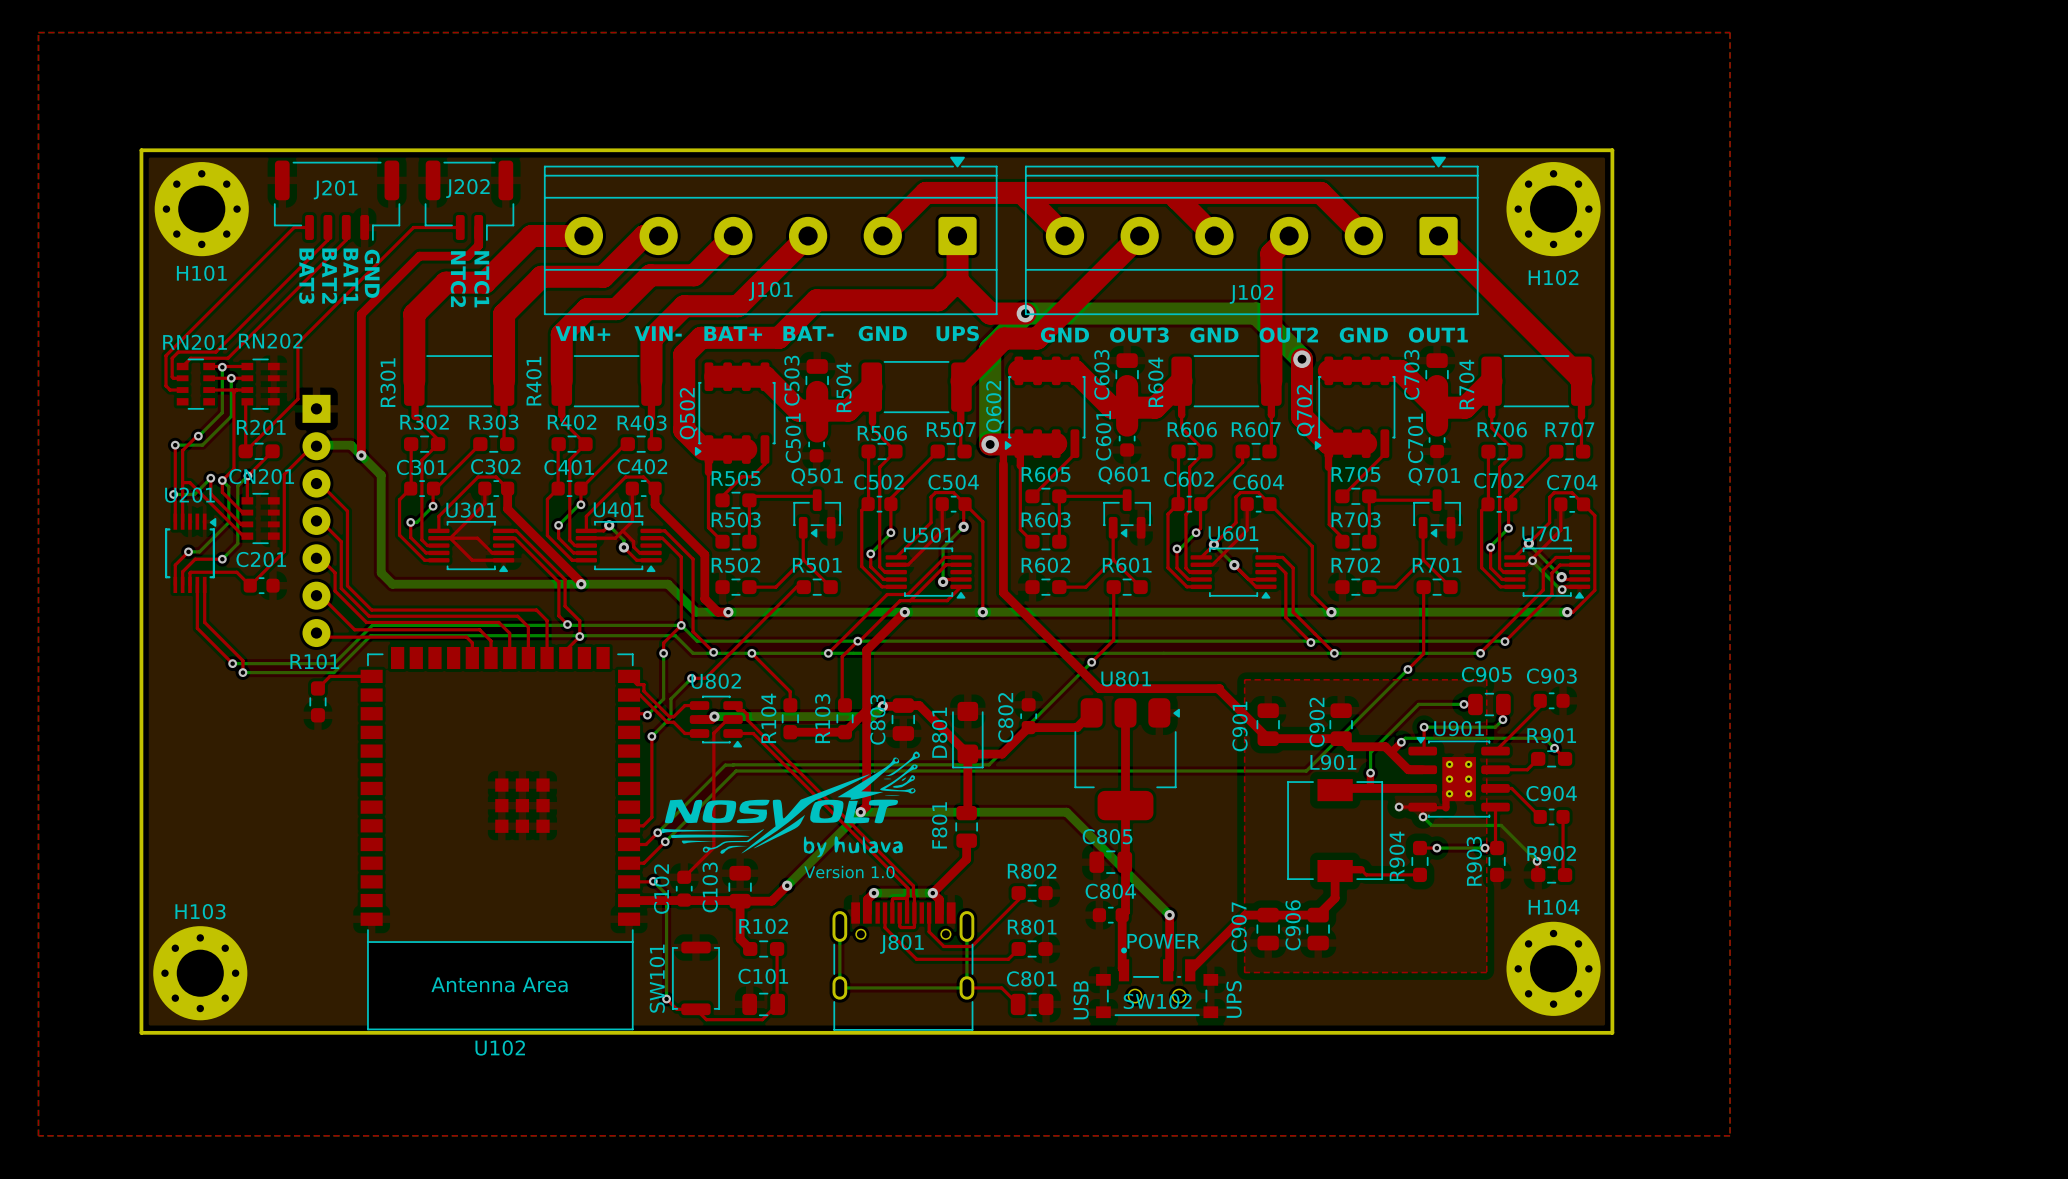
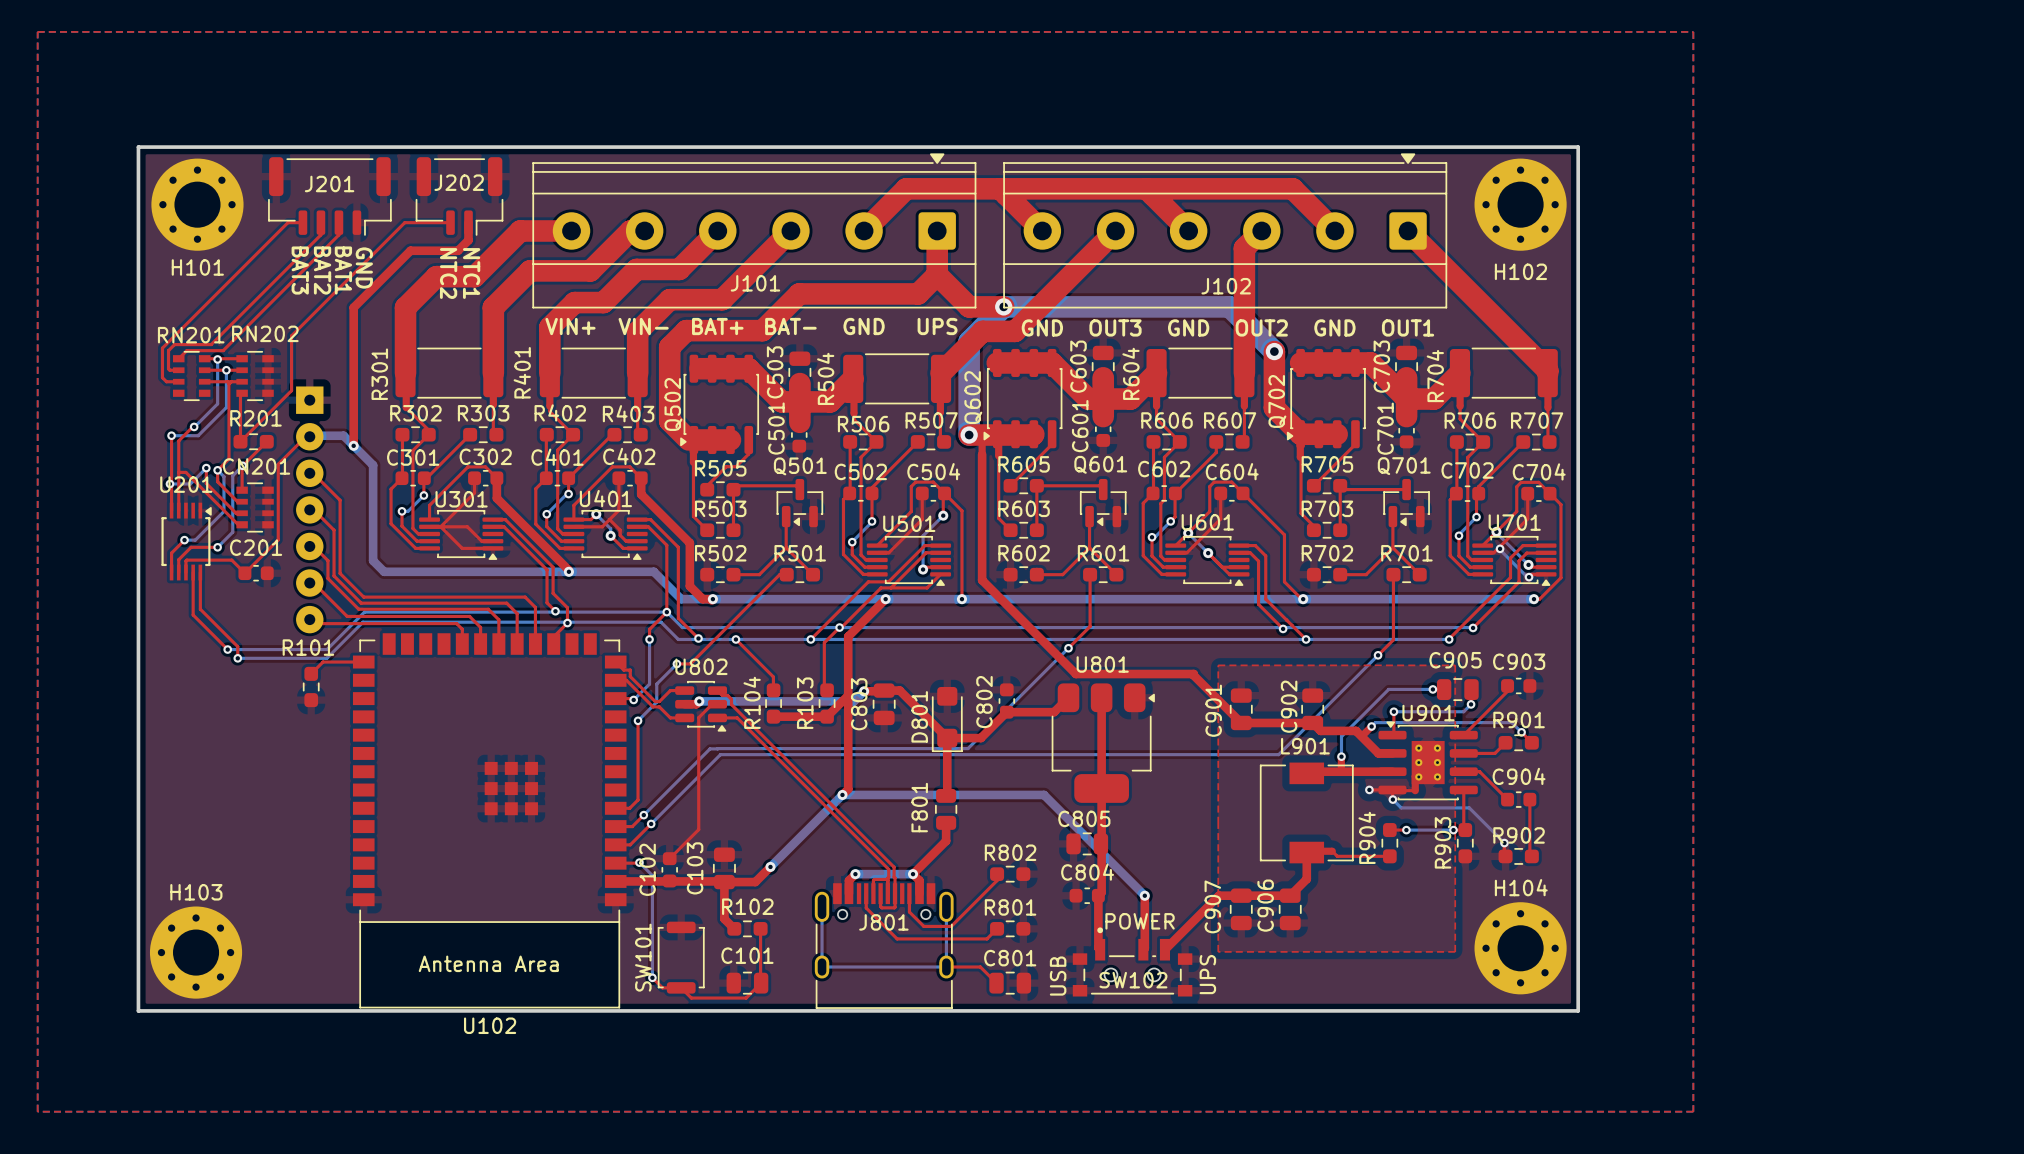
drawing: [661, 751, 920, 858] -> none
text: Version 1.0 (849, 872) -> none

